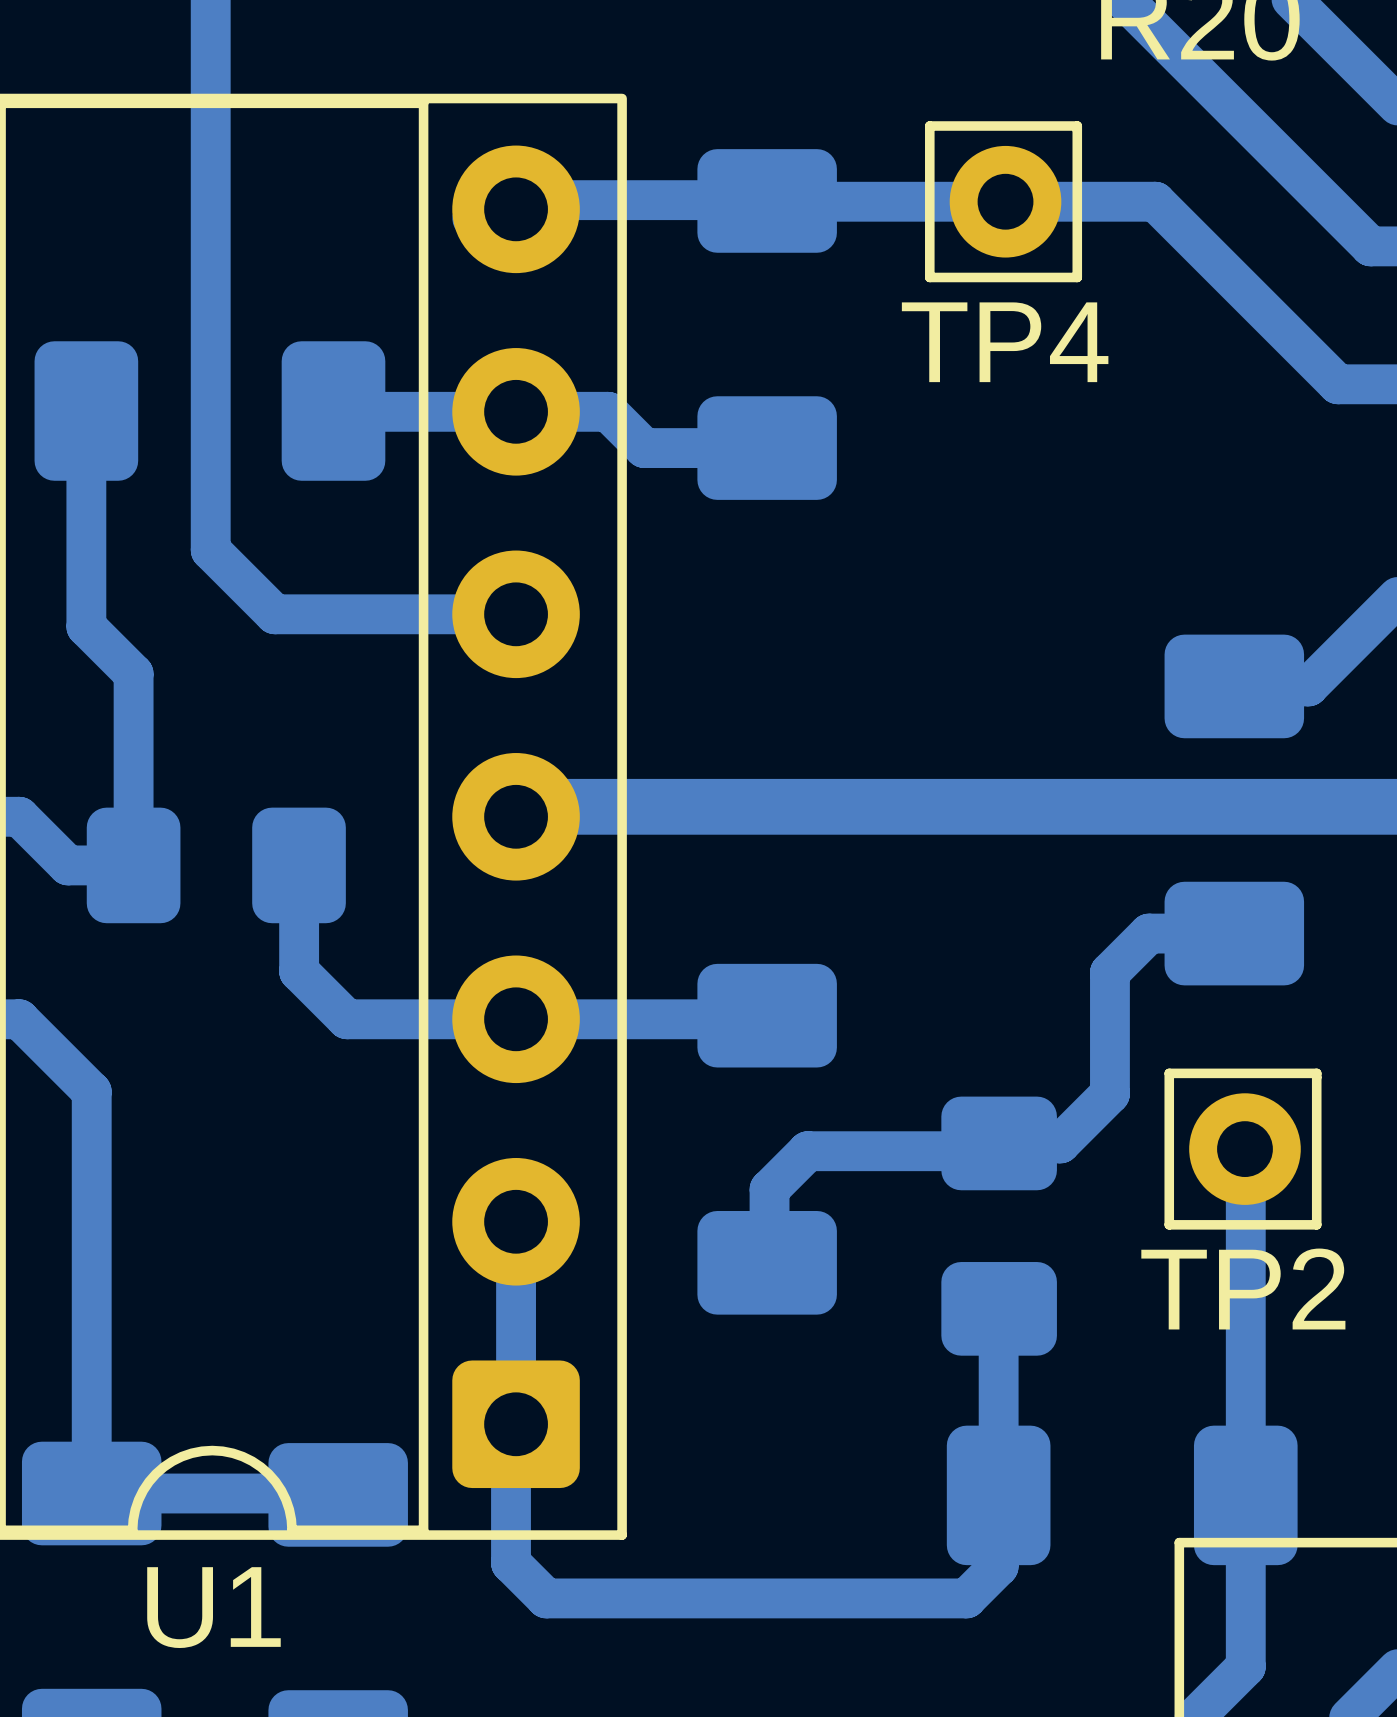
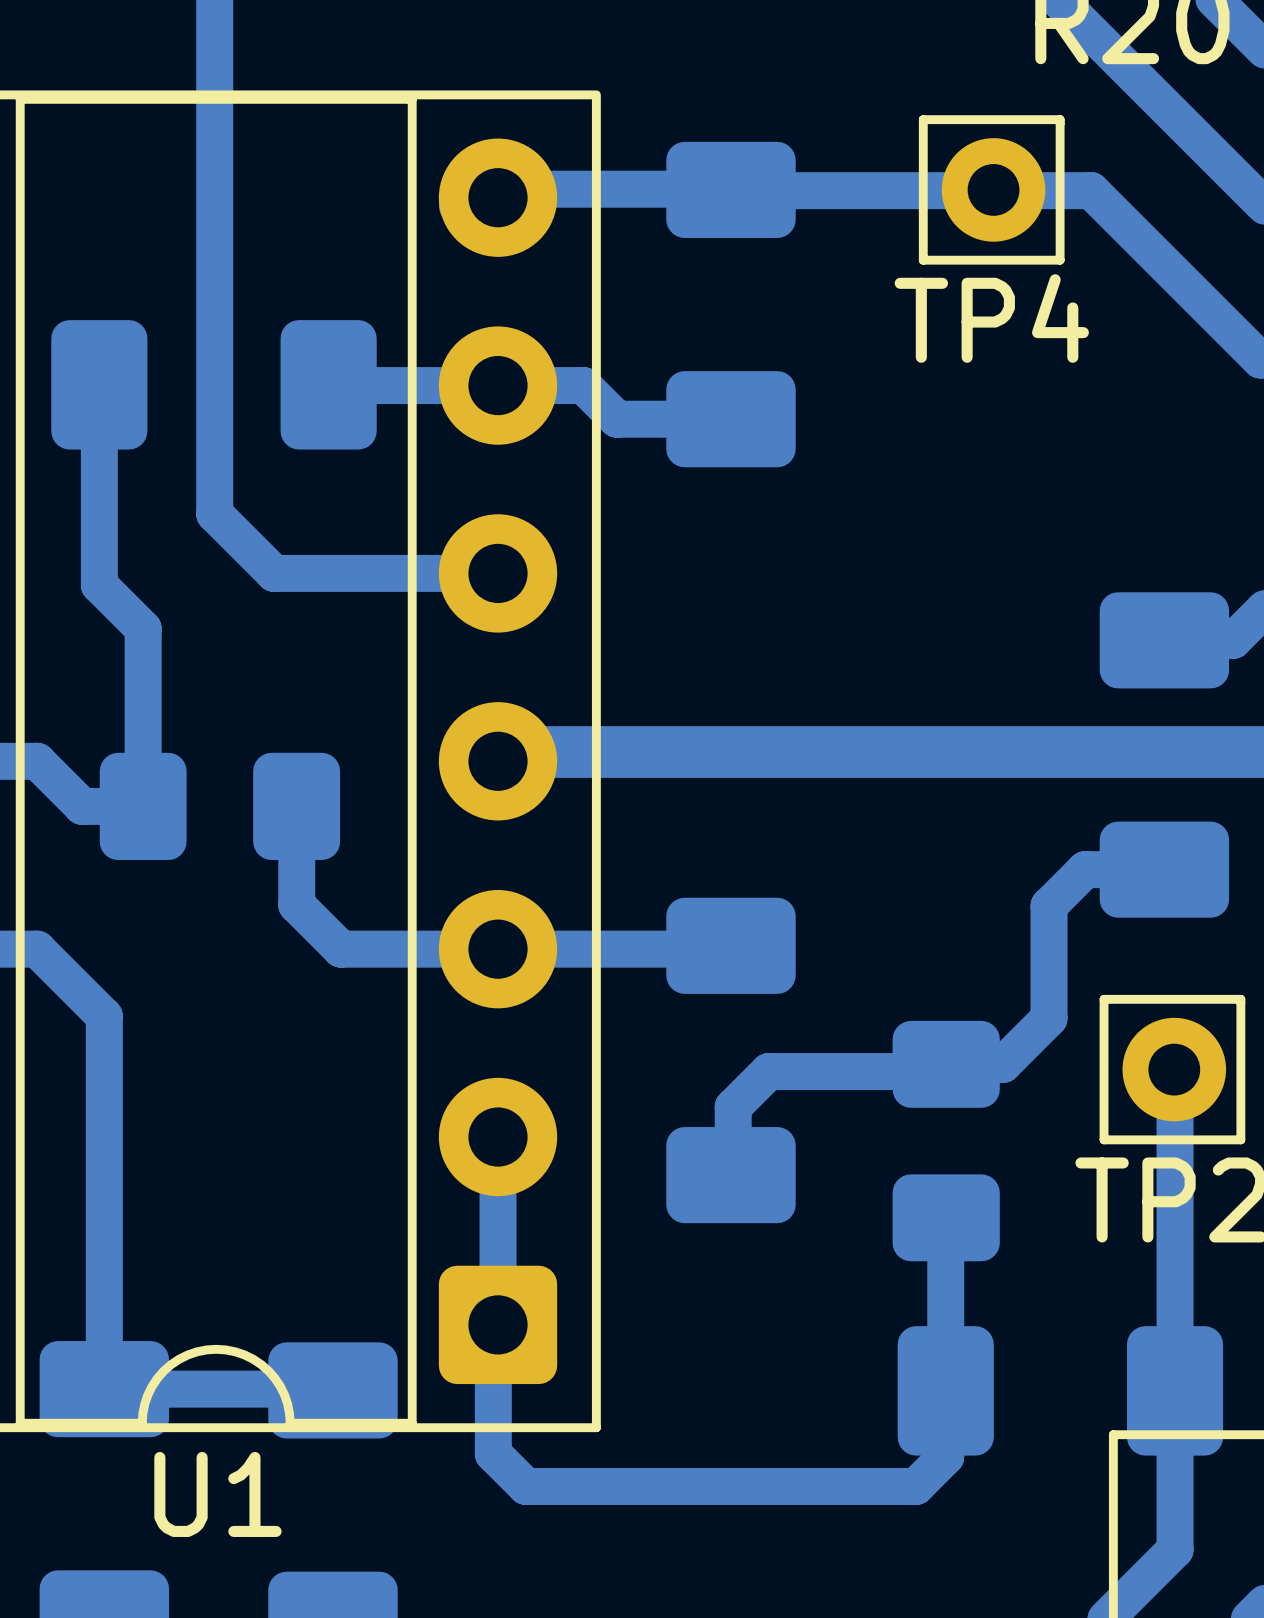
TP4 position: (1003, 201) -> (991, 189)

